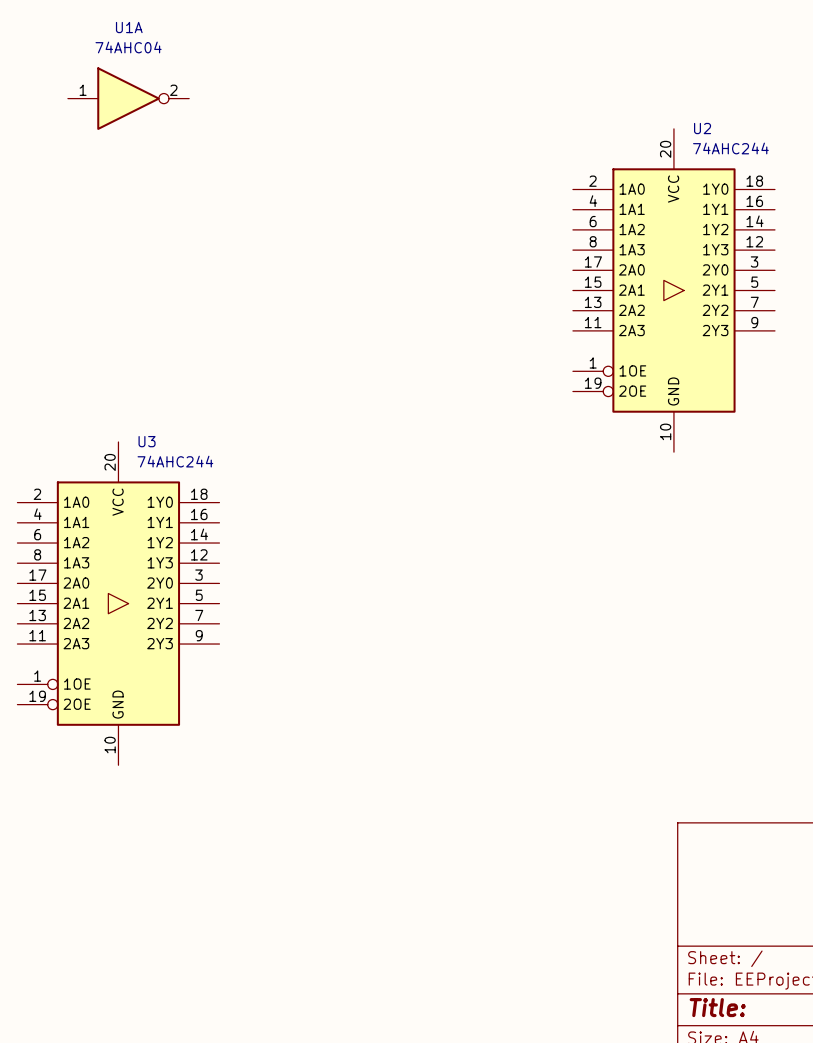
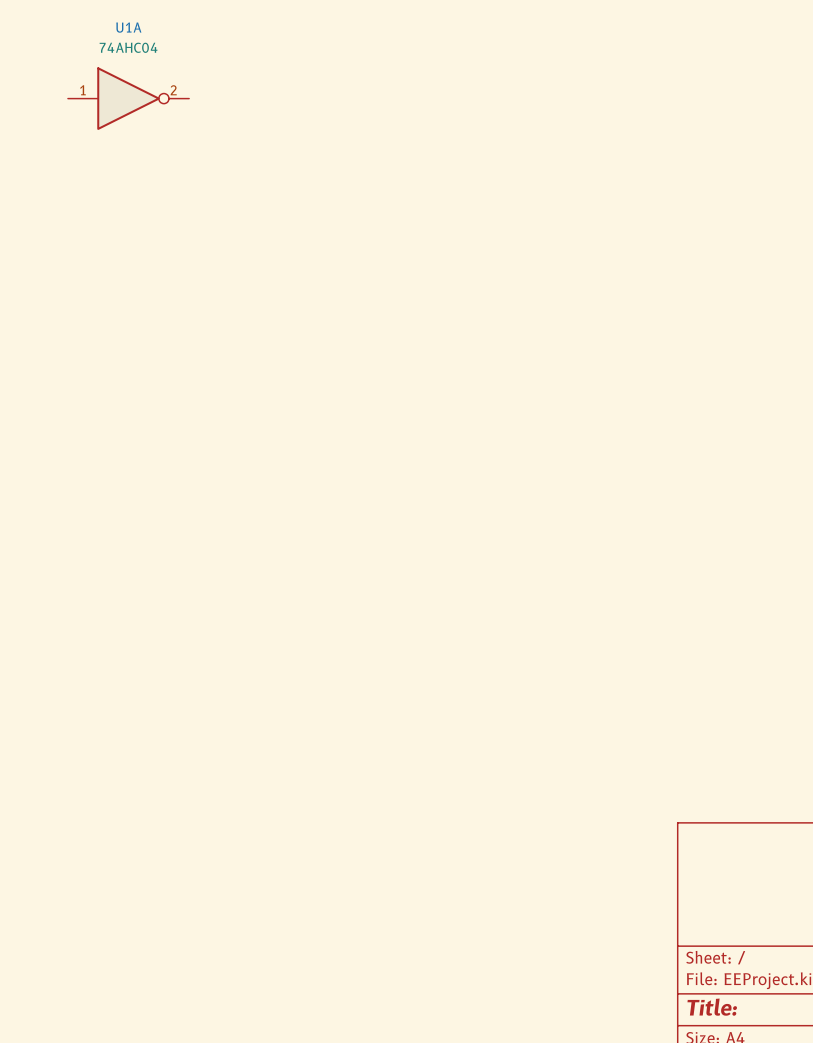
U2: 74AHC244 (673, 290) -> none
U3: 74AHC244 (118, 603) -> none

